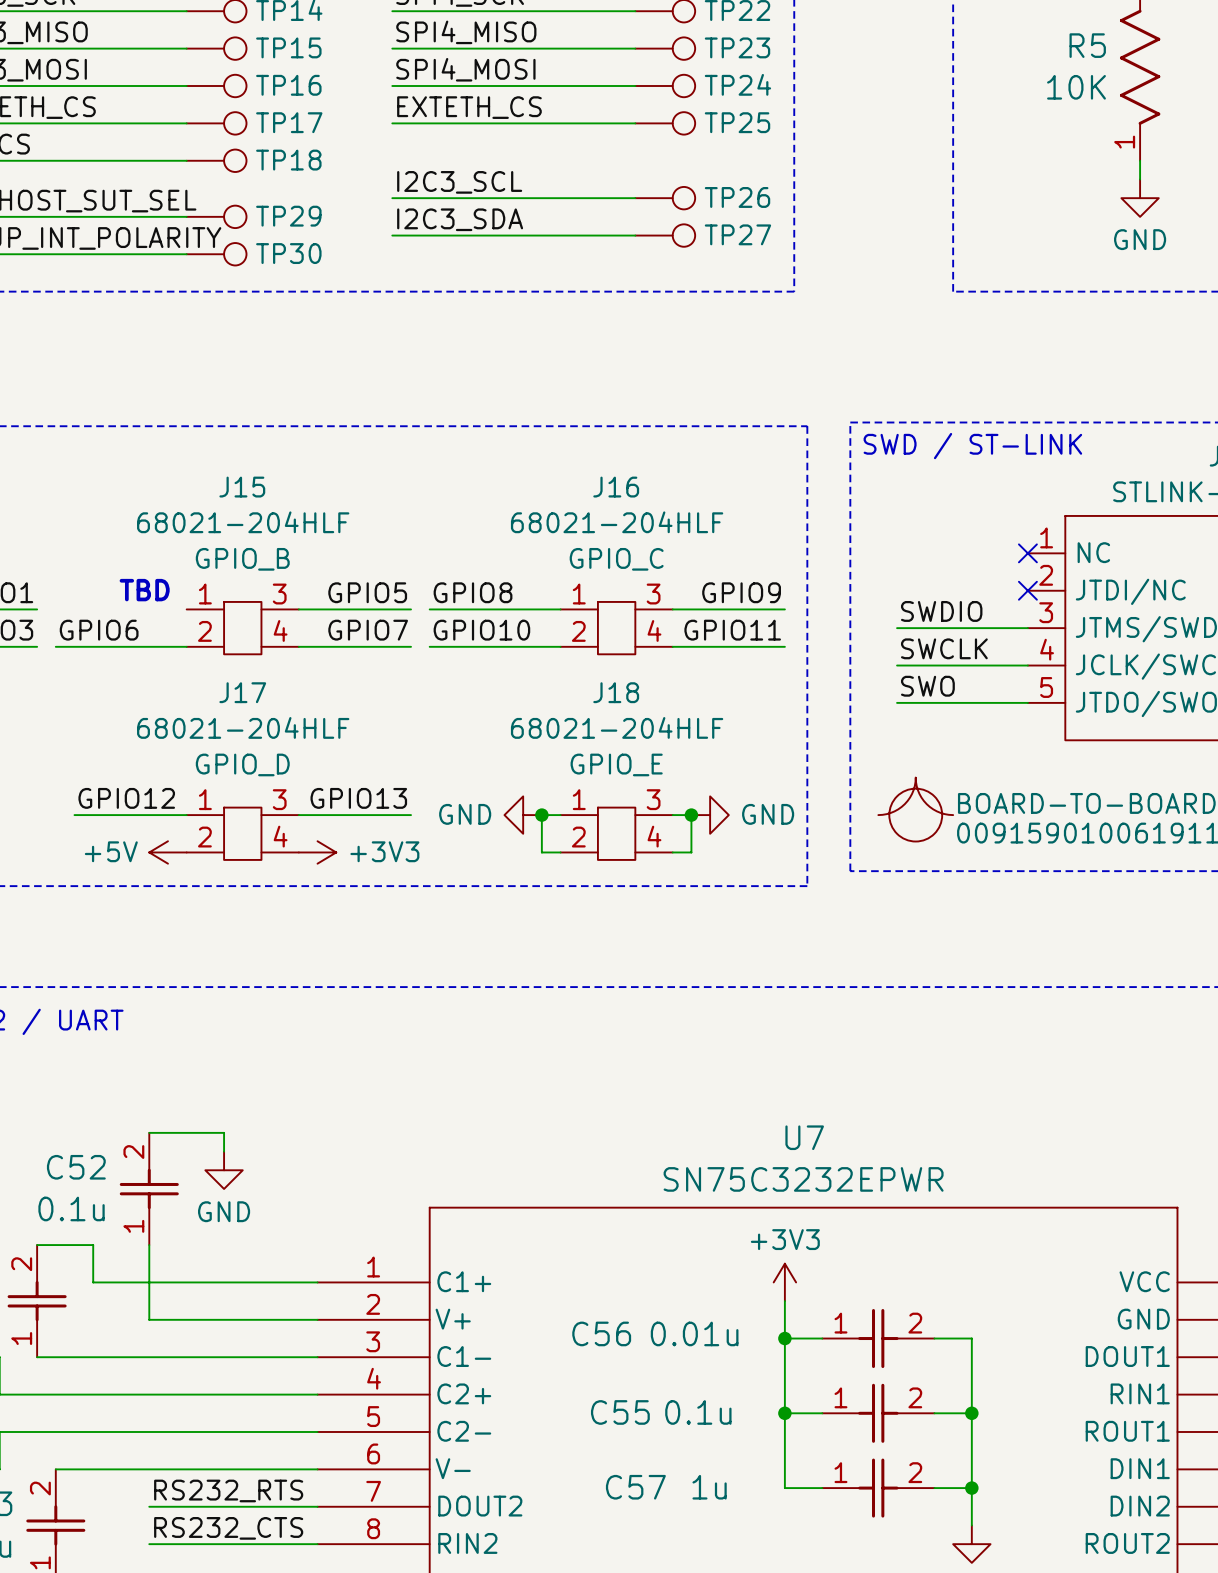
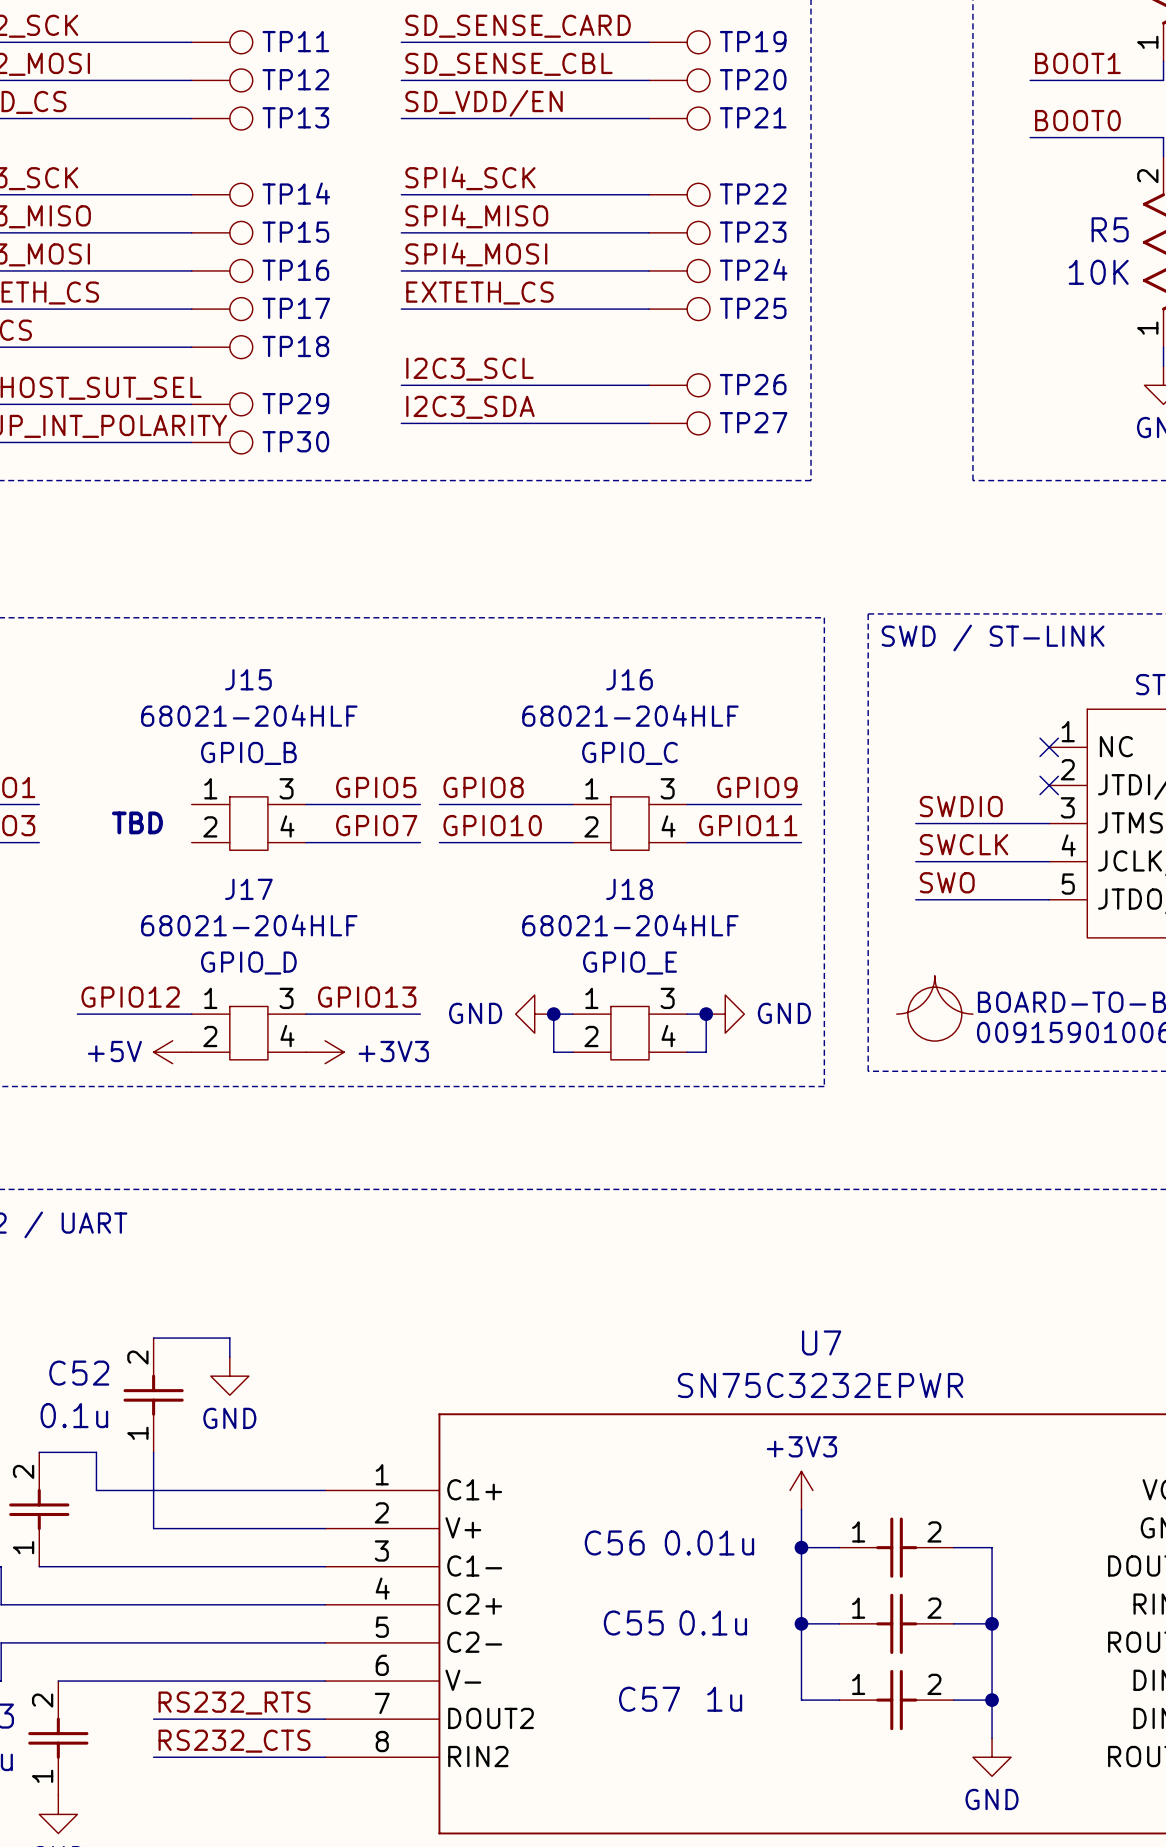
text position: TBD (144, 590) -> TBD (137, 822)
label: GPIO6 (99, 630) -> none
wire: (55, 646) (186, 646) -> none

